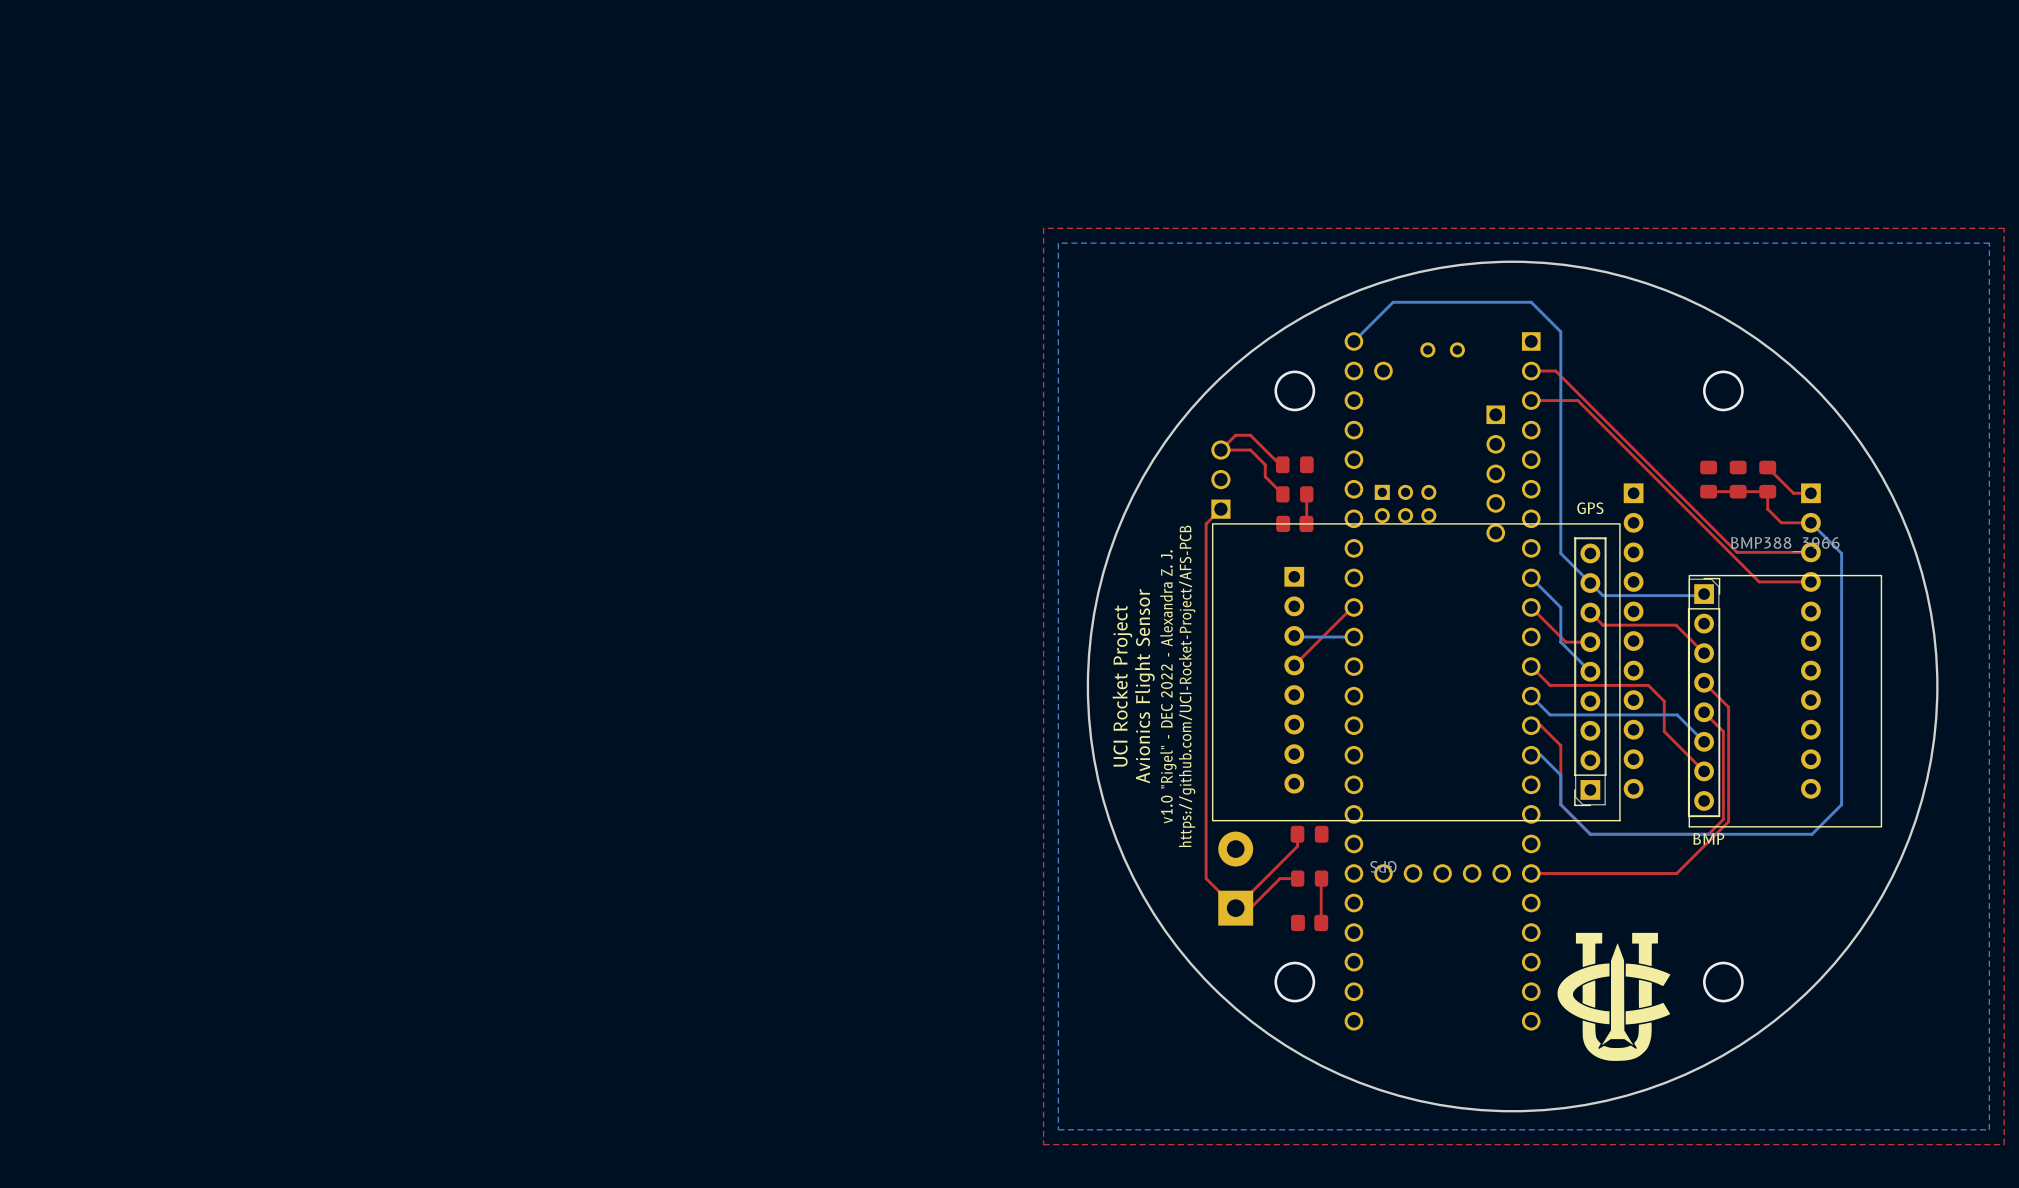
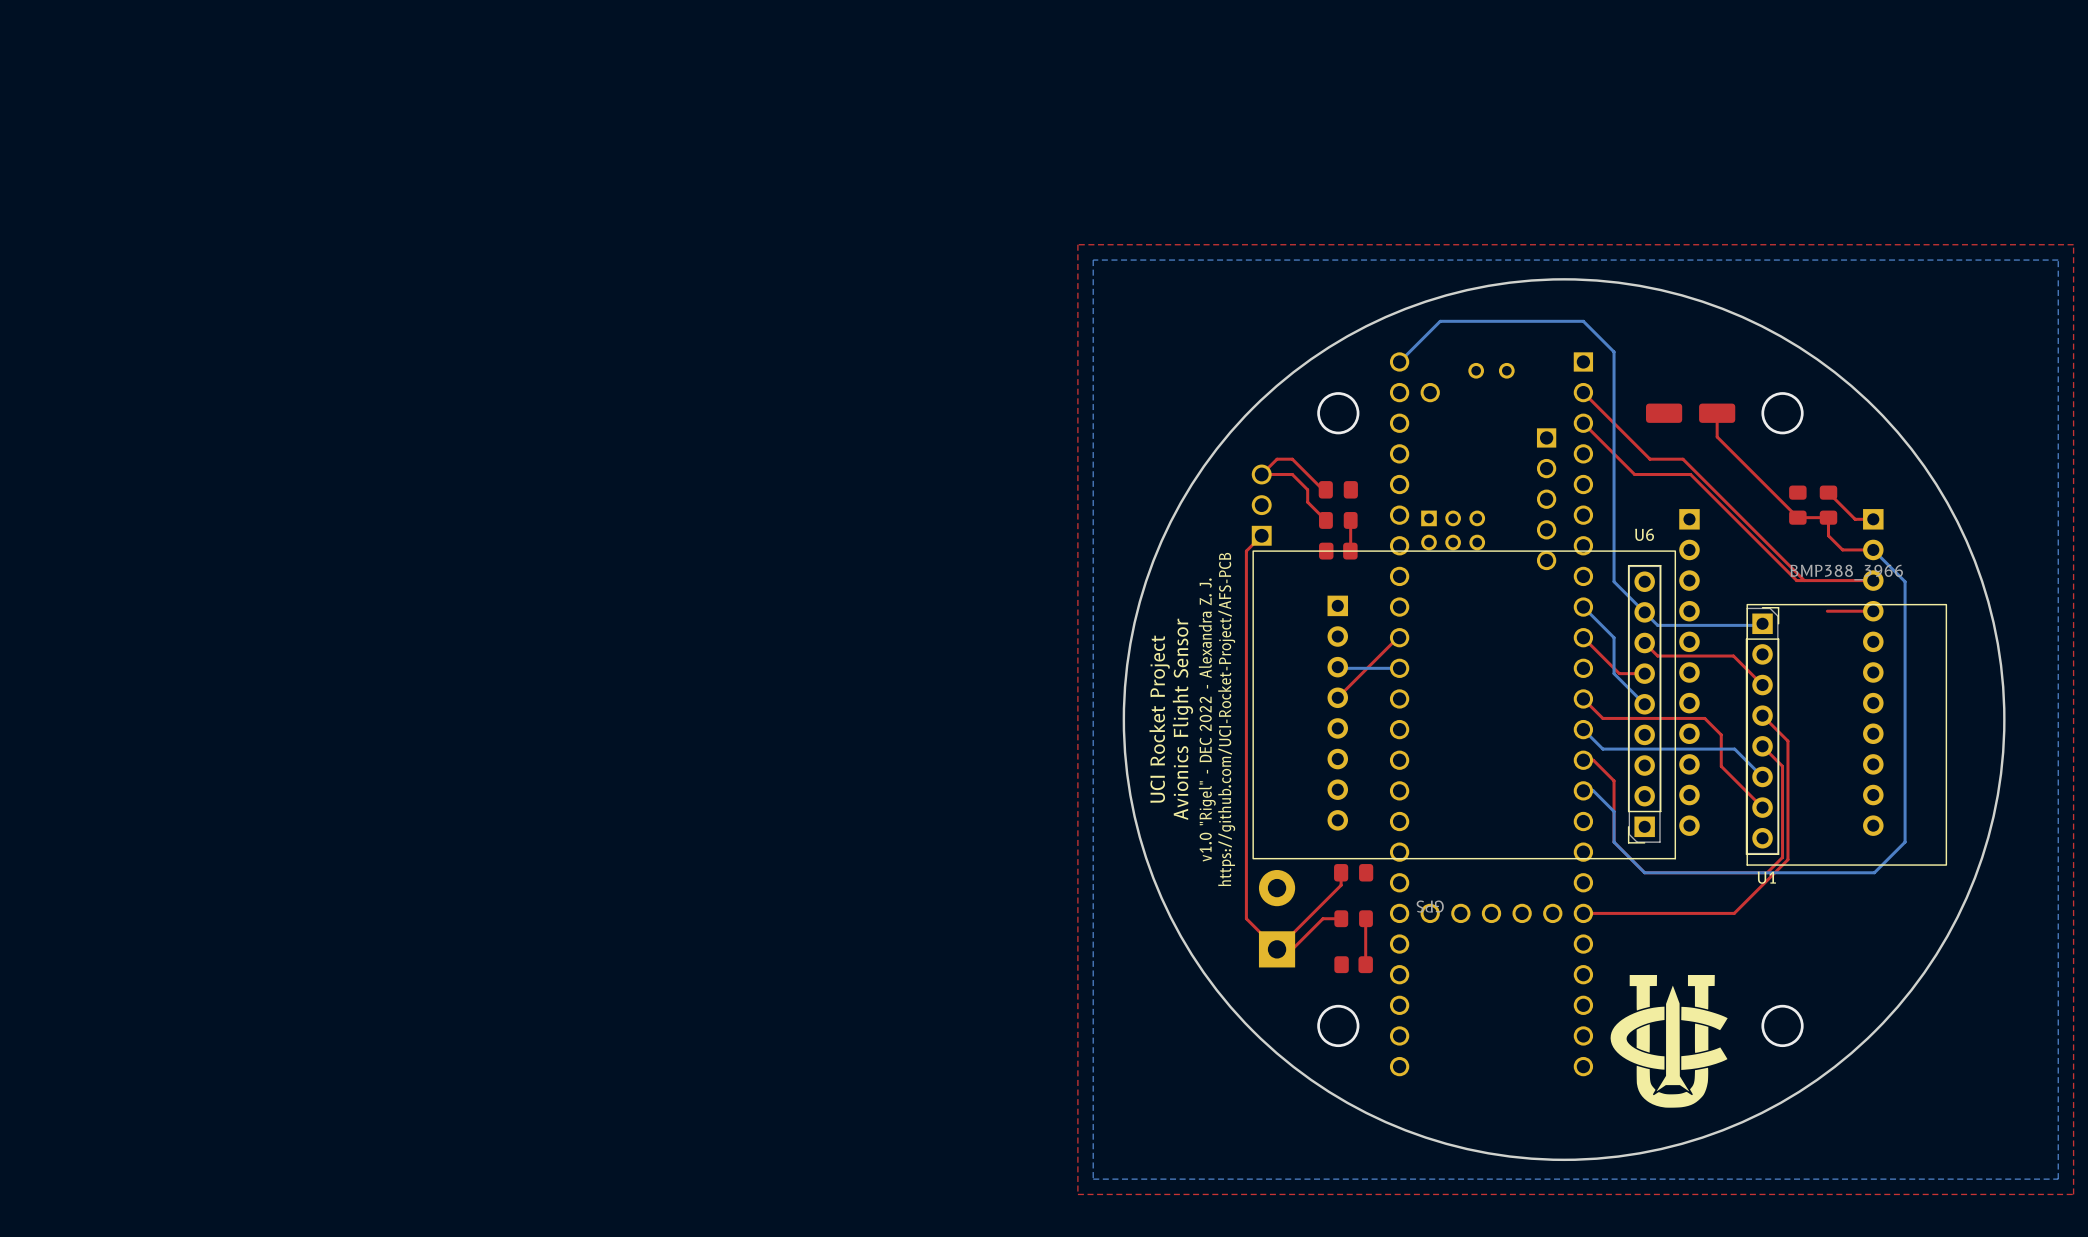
top track: (1531, 371) (1555, 371) (1634, 450) -> (1583, 423) (1634, 474) (1690, 474)
top track: none -> (1583, 392) (1649, 459) (1682, 459) (1804, 580)
part: none -> (1690, 413)
top track: (1531, 400) (1577, 400) (1759, 581) (1766, 581) -> none
part: (1708, 479) -> none
top track: (1738, 491) (1708, 491) -> (1797, 517) (1717, 436) (1717, 413)
GPS name: GPS (1590, 508) -> U6 (1644, 534)
BMP name: BMP (1708, 838) -> U1 (1766, 877)

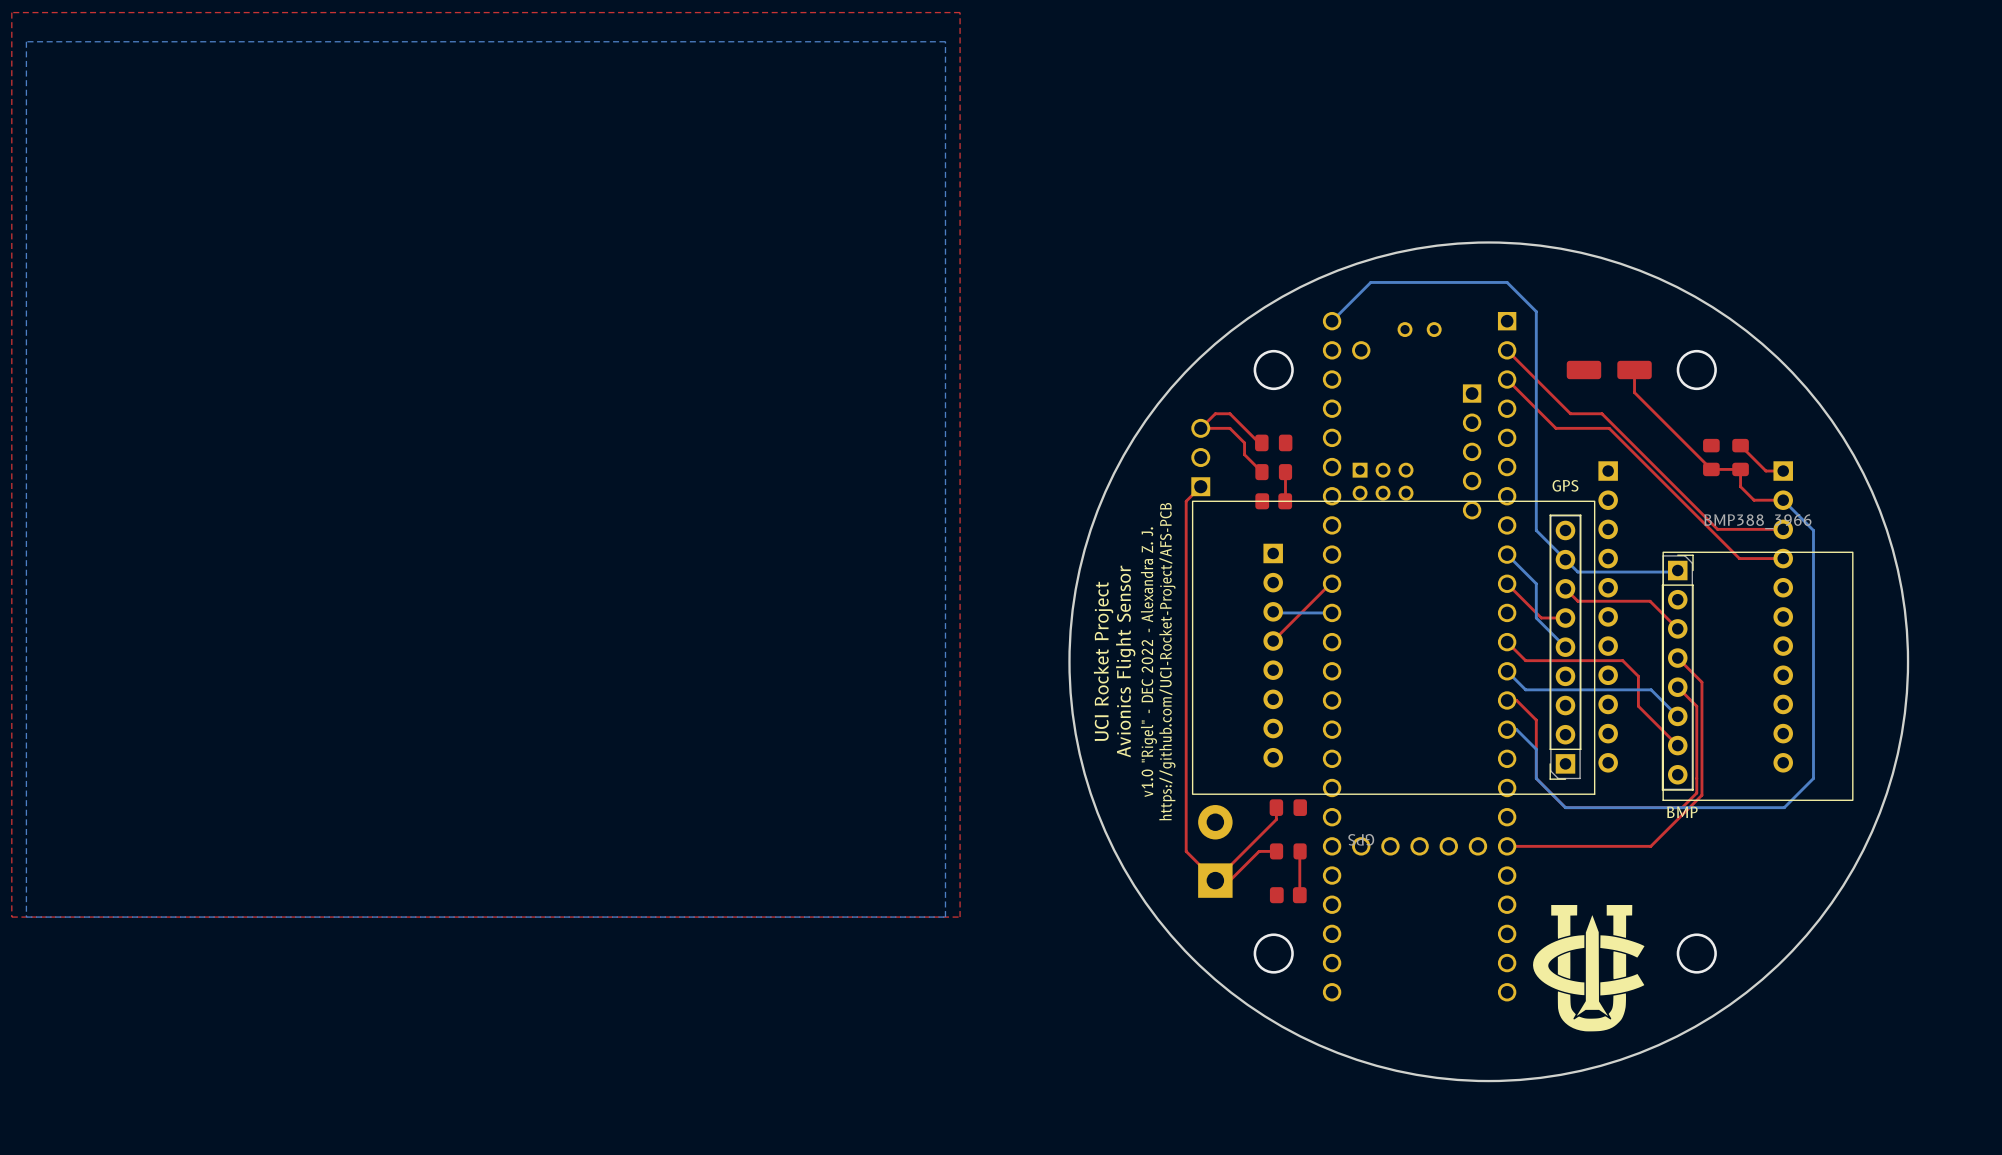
top zone outline: none -> (960, 12) (960, 917) (11, 917) (11, 12) (960, 12)
bottom zone outline: none -> (945, 41) (945, 917) (26, 917) (26, 41) (945, 41)
top zone outline: (2073, 244) (2073, 1194) (1077, 1194) (1077, 244) (2073, 244) -> none
bottom zone outline: (2058, 260) (2058, 1179) (1093, 1179) (1093, 260) (2058, 260) -> none
U6 name: U6 (1644, 534) -> GPS (1565, 485)
top track: (1804, 580) (1796, 580) -> (1739, 558) (1710, 529)
U1 name: U1 (1766, 877) -> BMP (1682, 812)

